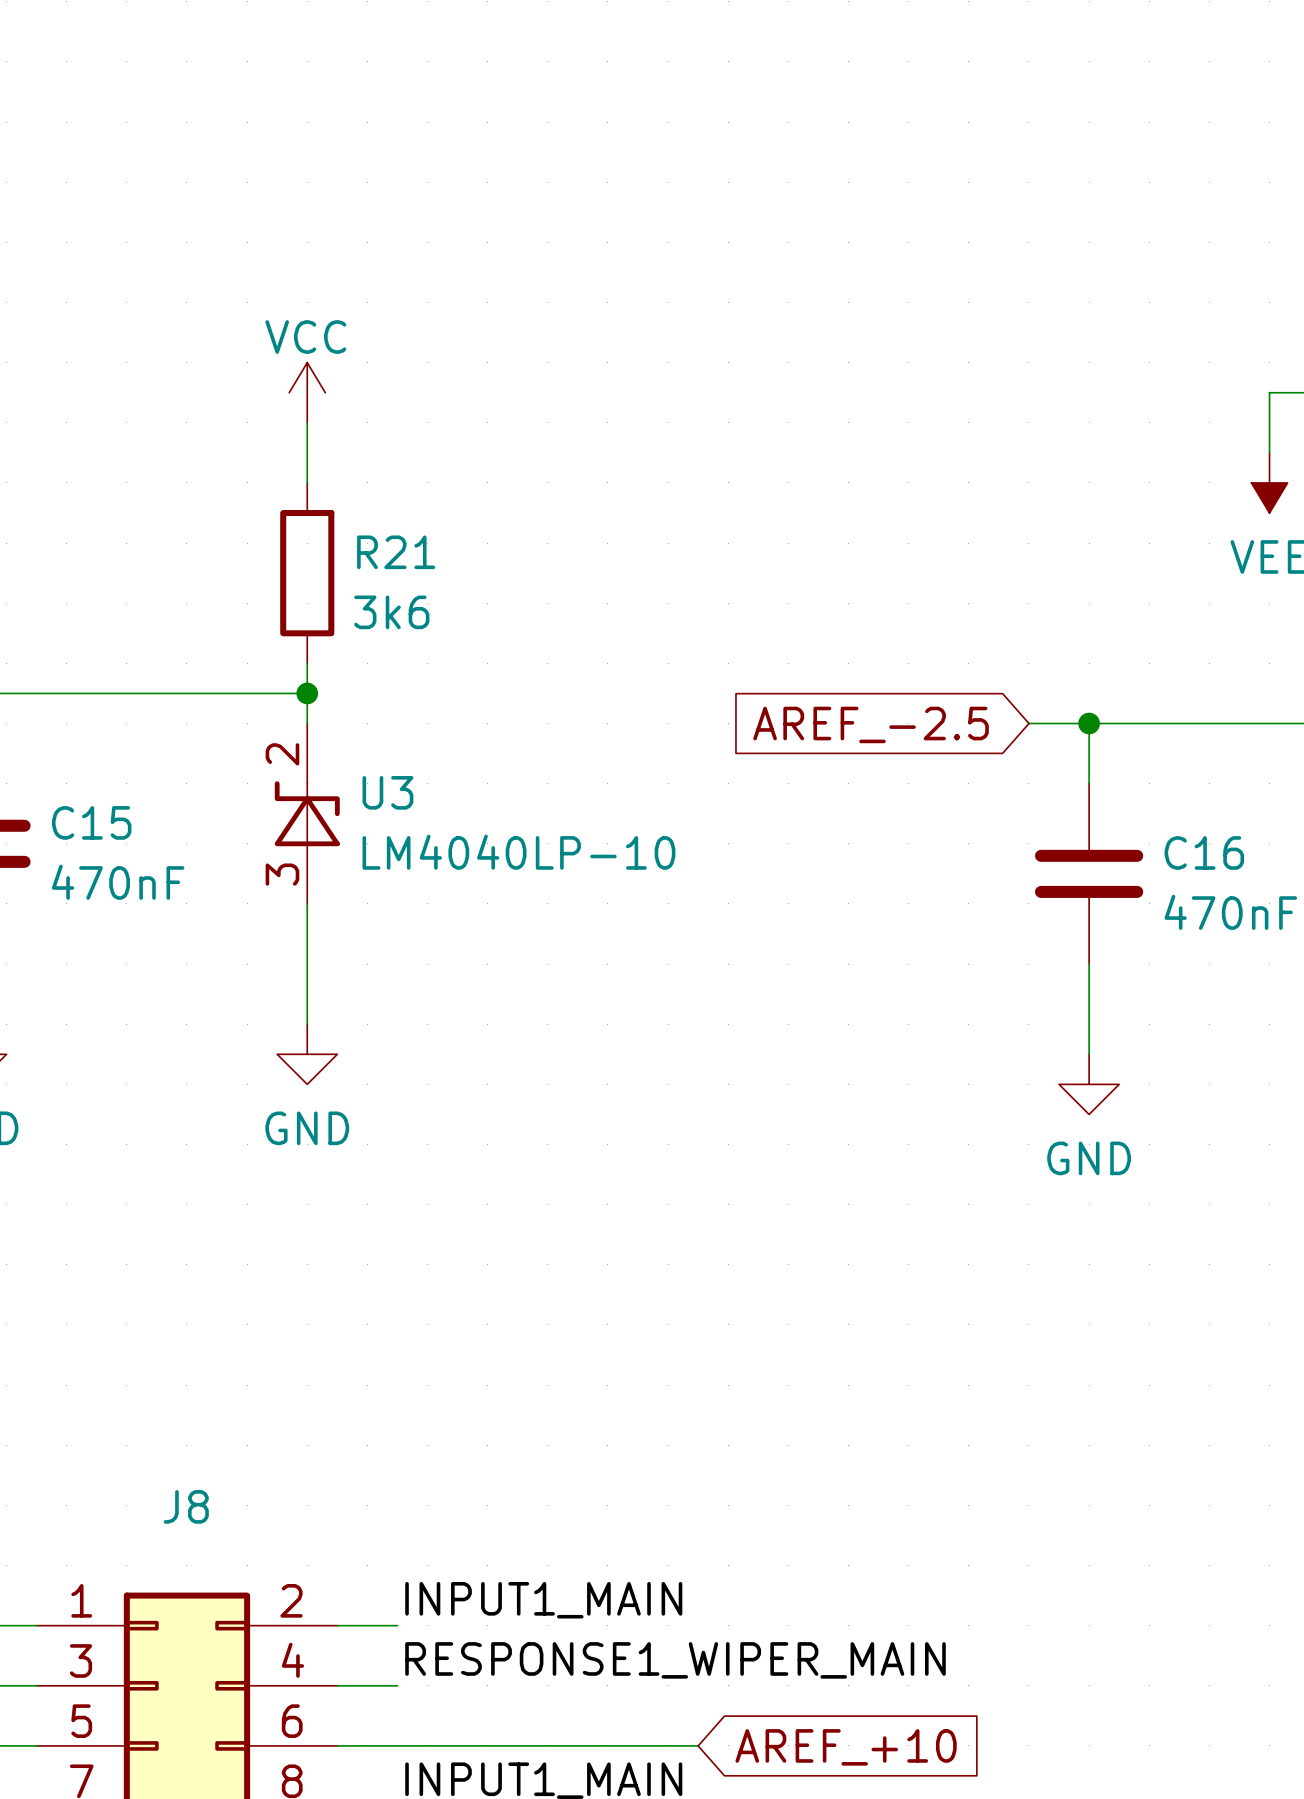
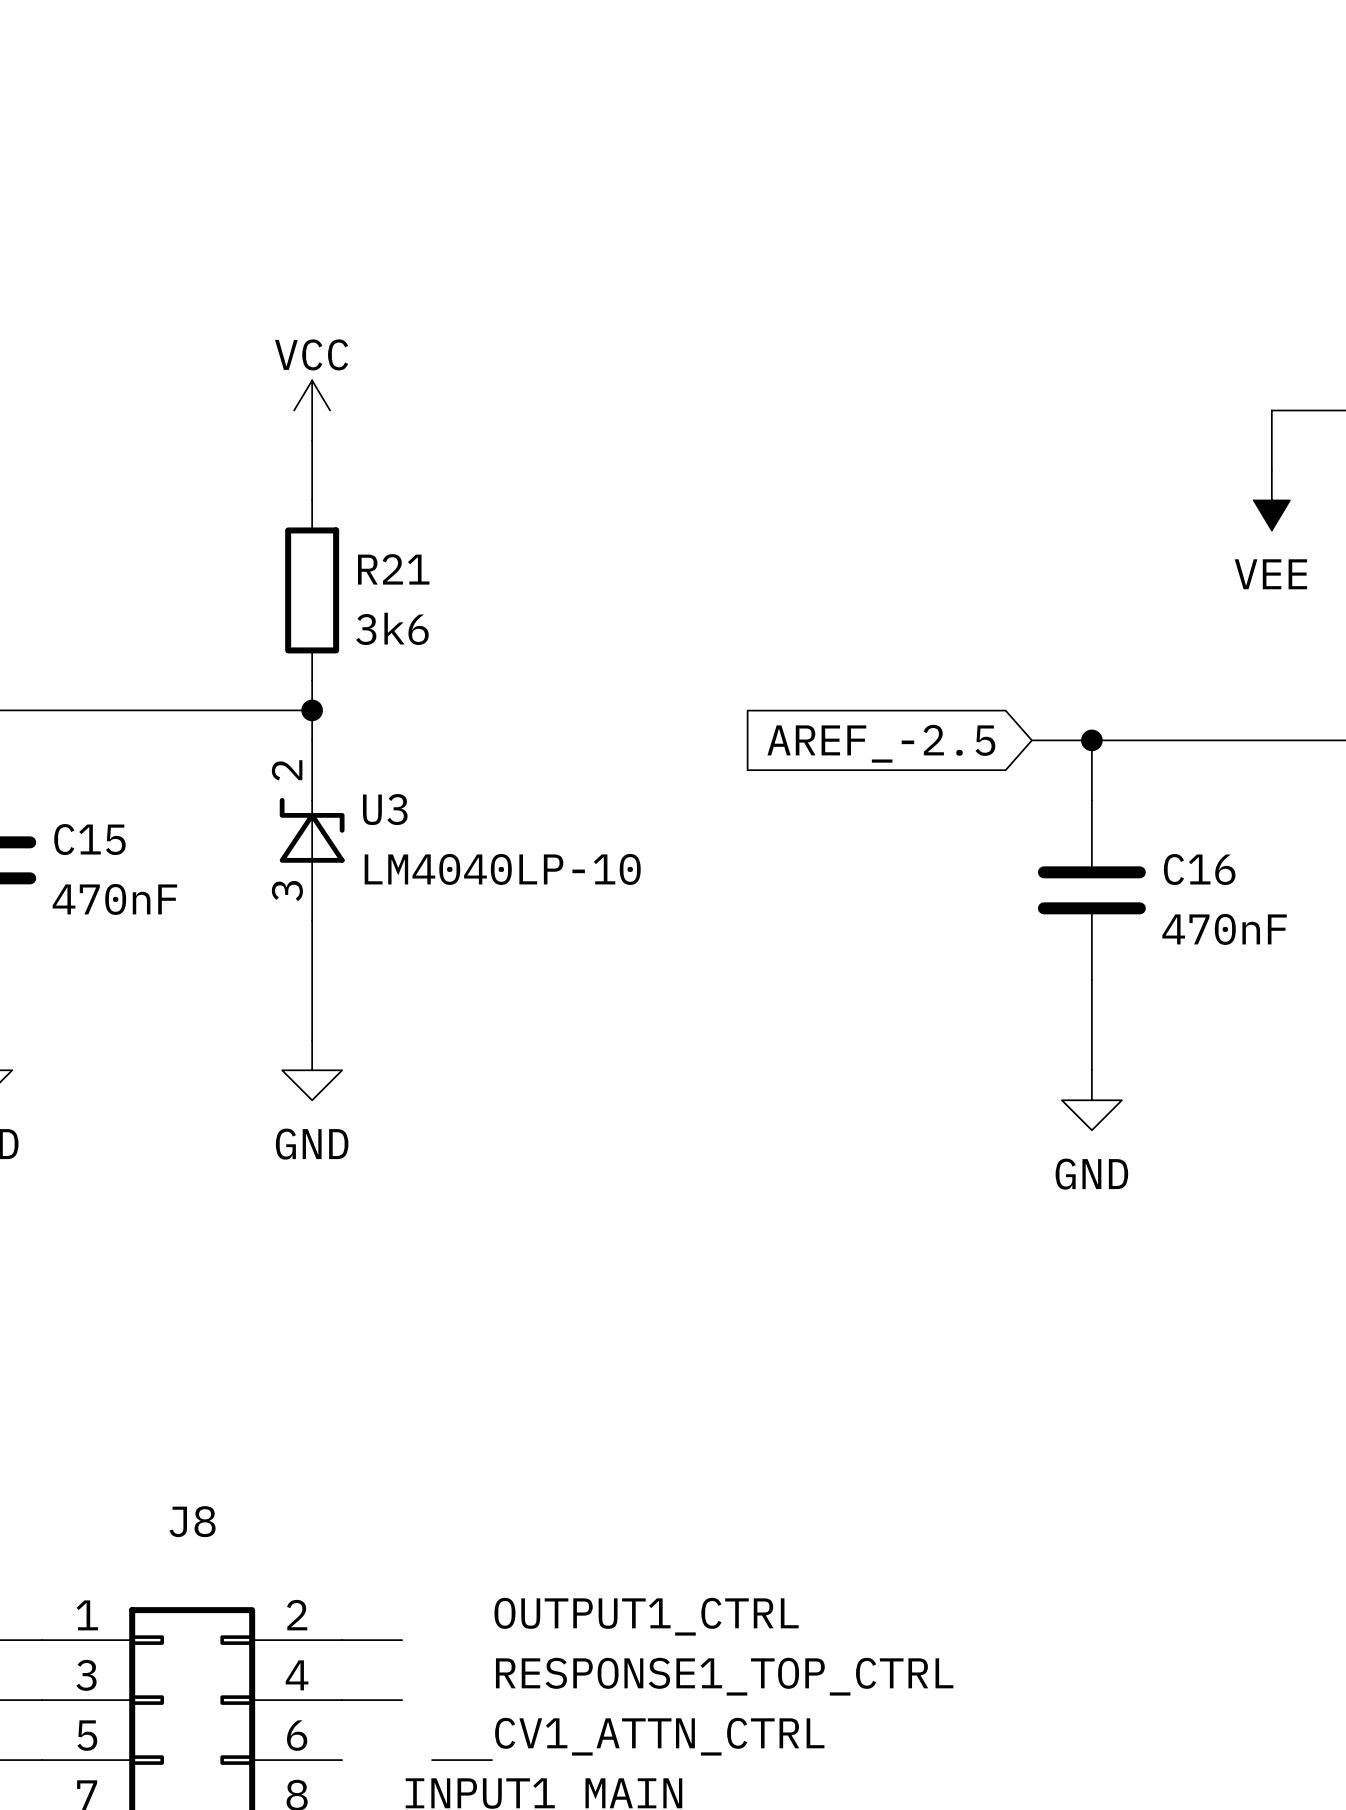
label: INPUT1_MAIN (543, 1600) -> none
label: none -> OUTPUT1_CTRL (646, 1616)
label: RESPONSE1_WIPER_MAIN (675, 1660) -> RESPONSE1_TOP_CTRL (724, 1676)
label: none -> CV1_ATTN_CTRL (659, 1736)
wire: (337, 1745) (427, 1745) -> none
wire: (487, 1745) (698, 1745) -> none
global label: AREF_+10 (846, 1747) -> none

